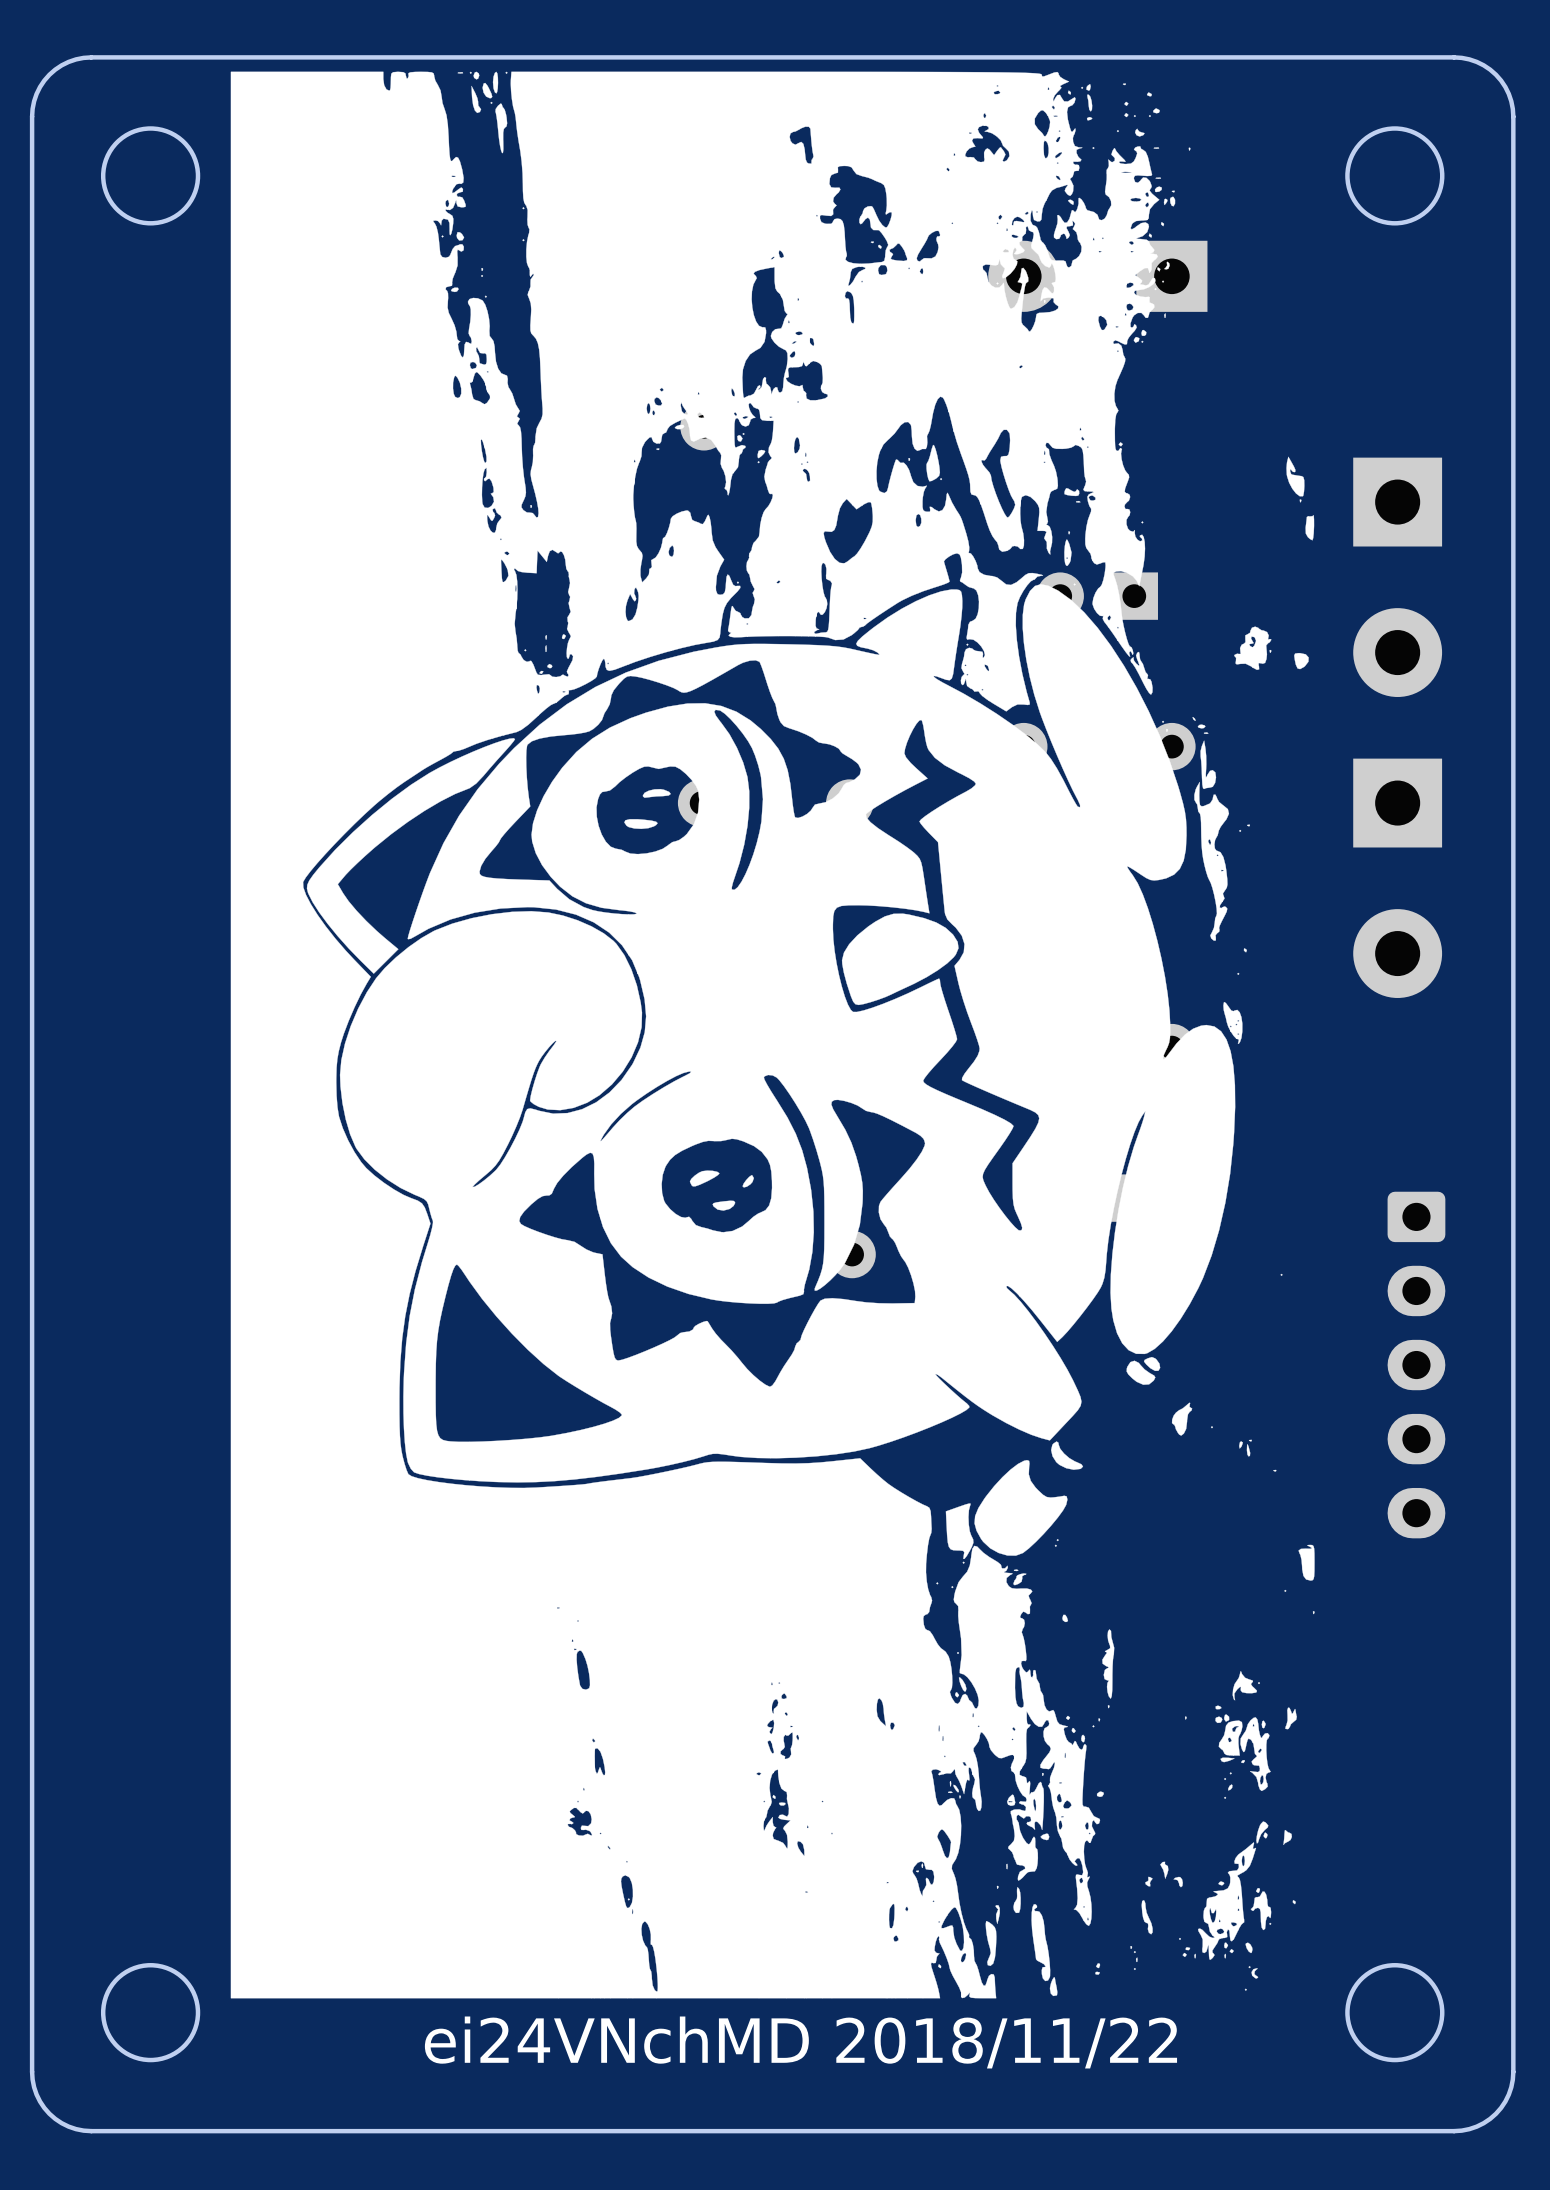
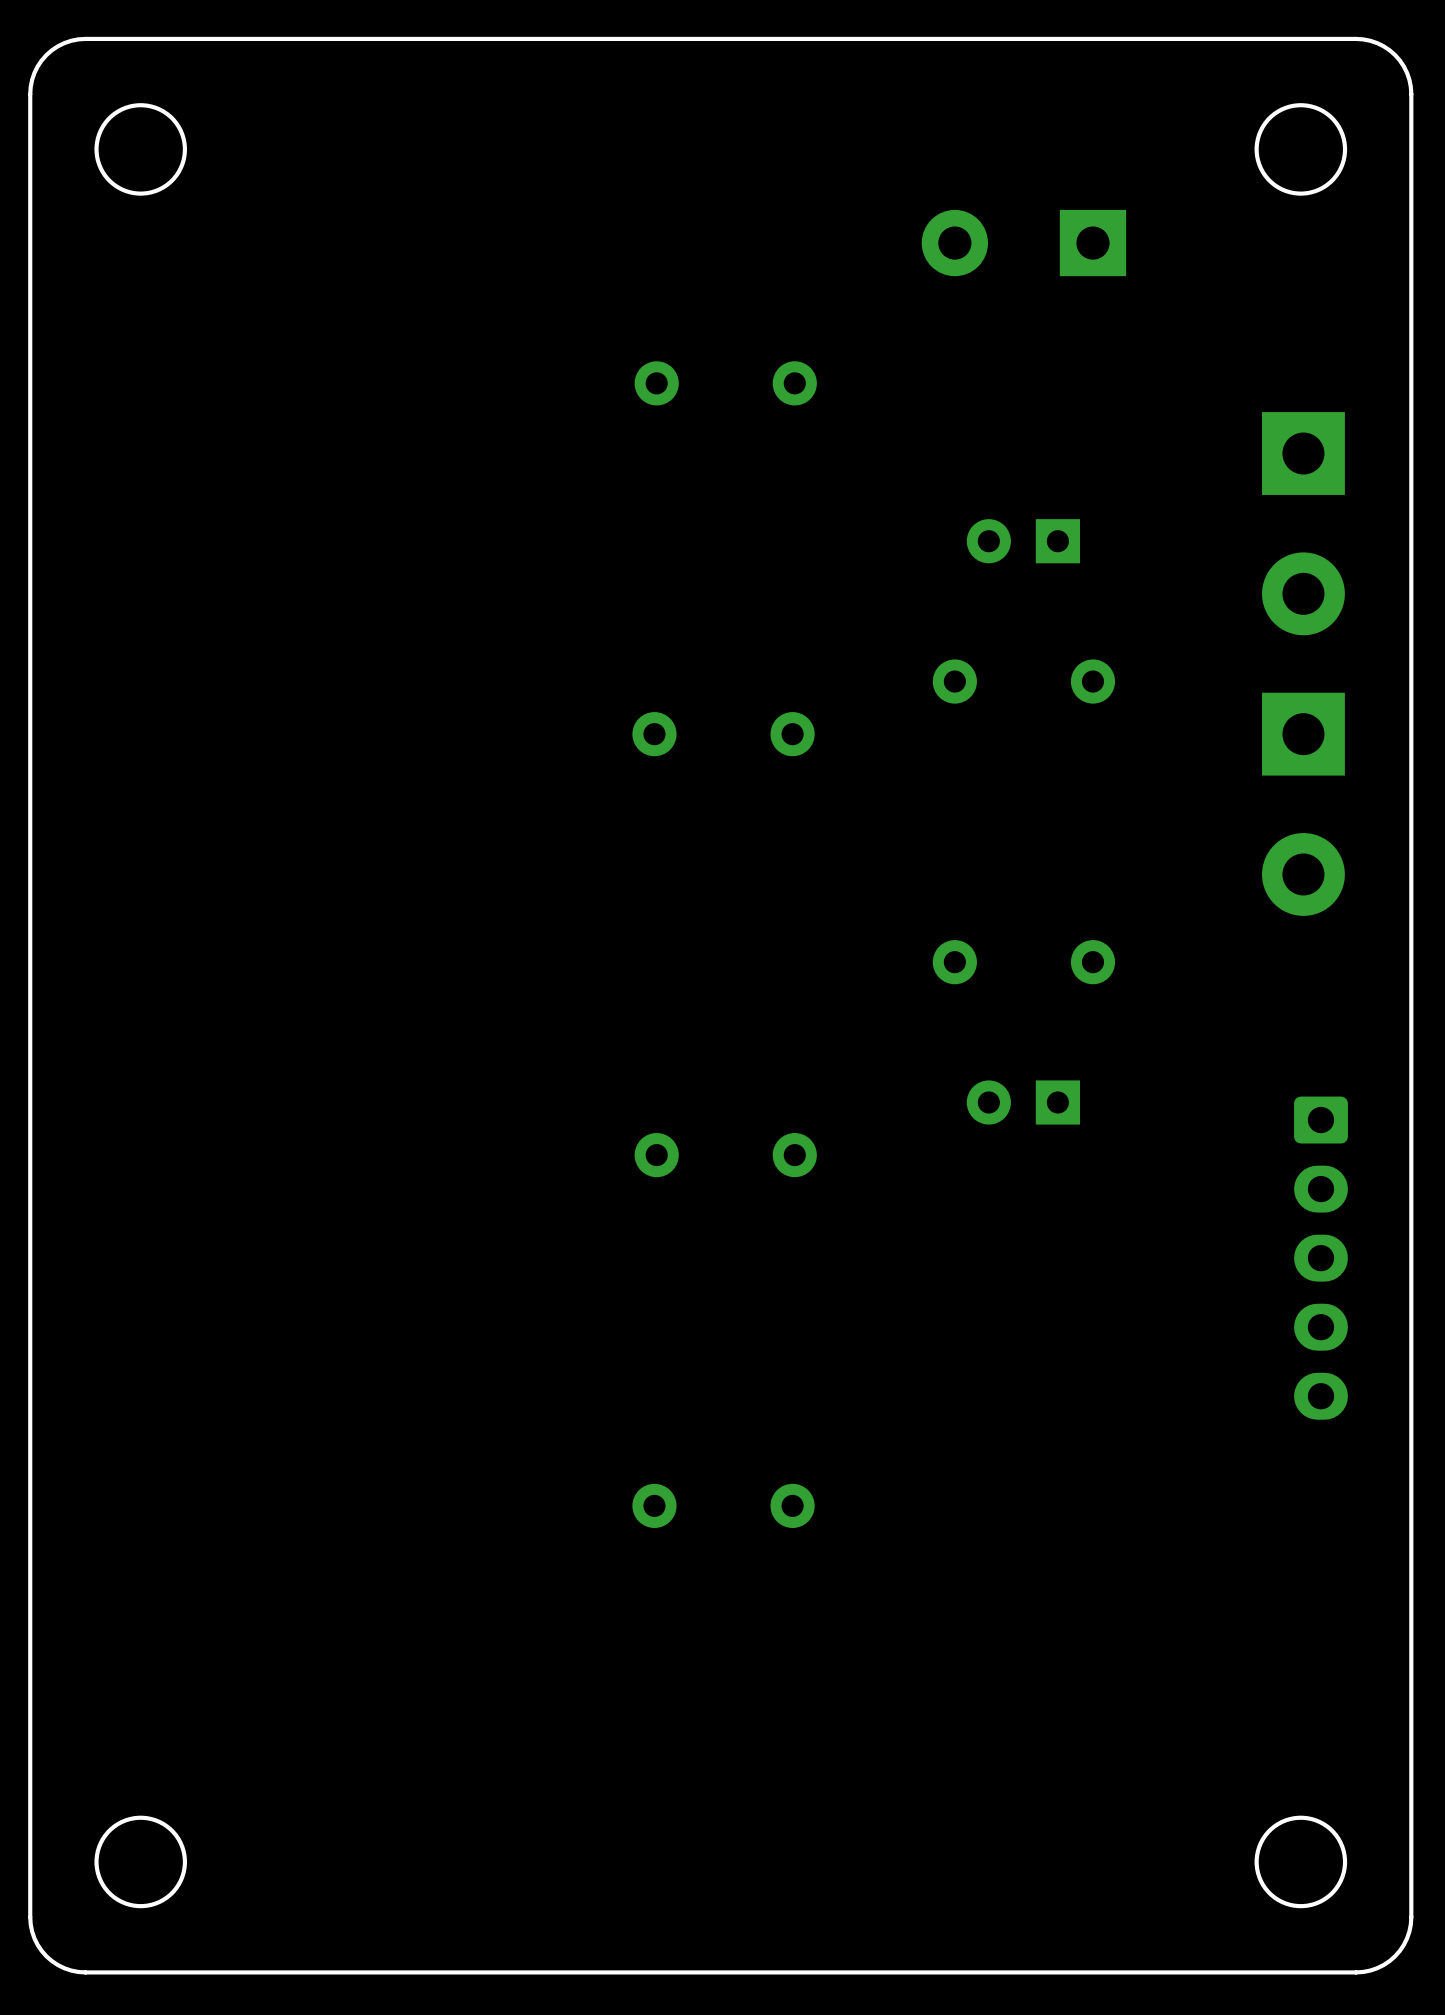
drawing: [230, 71, 1315, 1999] -> none
text: ei24VNchMD 2018/11/22 (800, 2042) -> none

